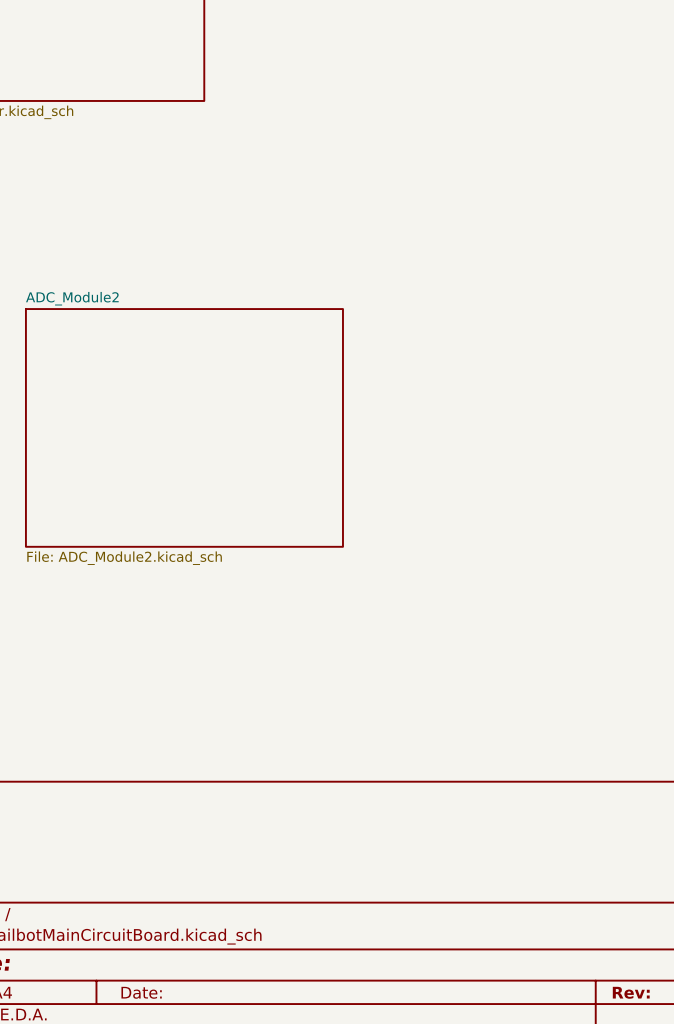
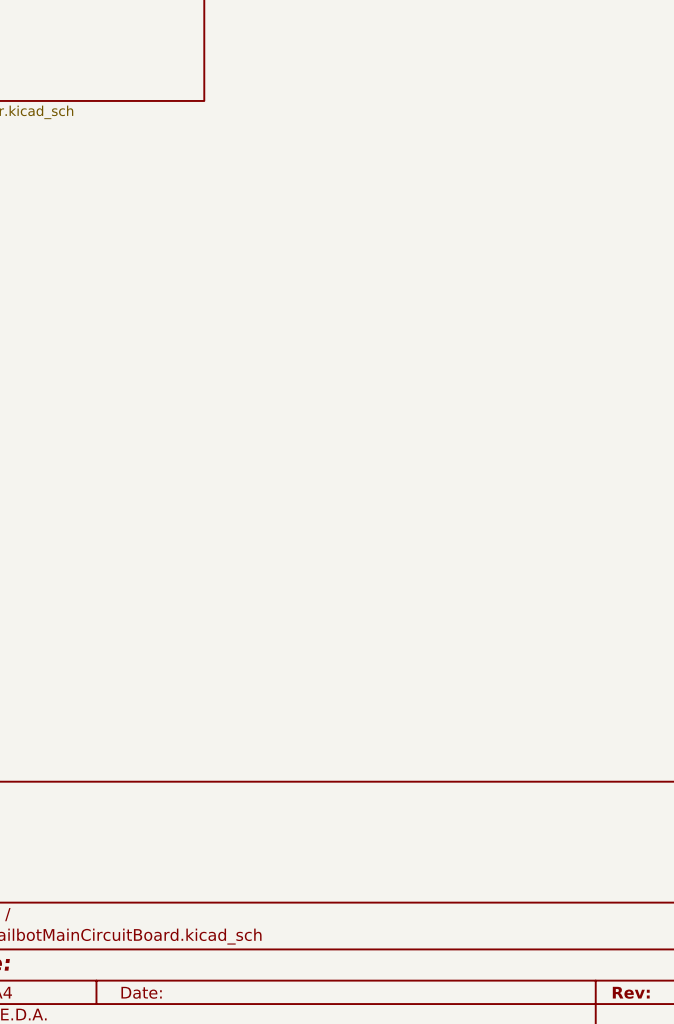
sheet ADC_Module2: File: ADC_Module2.kicad_sch (184, 427) -> none

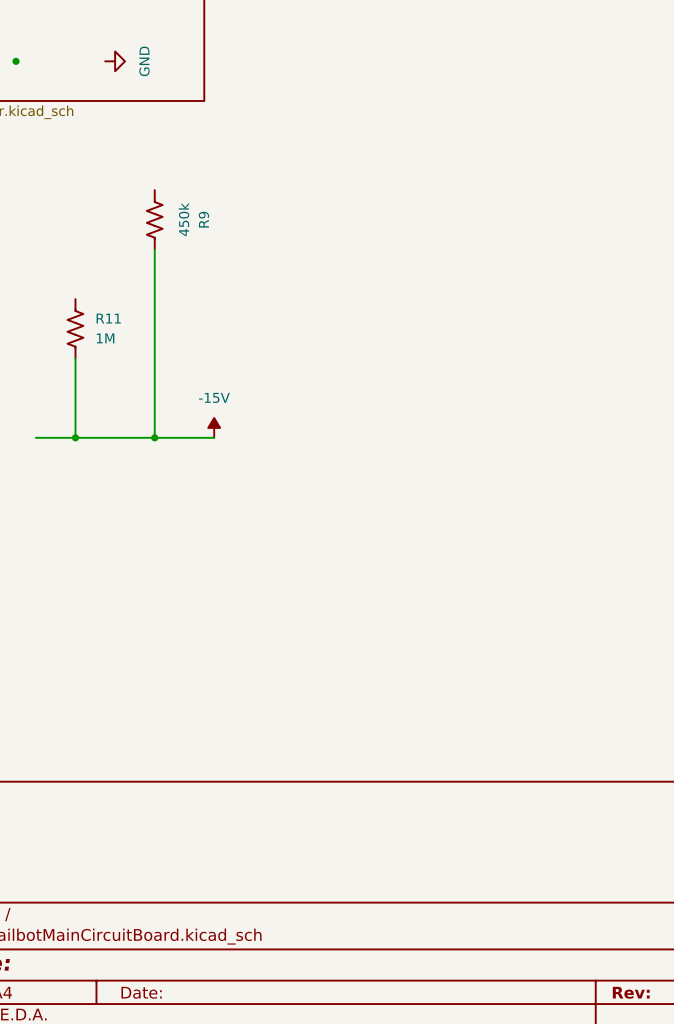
junction: none -> (16, 61)
power symbol: none -> GND (115, 61)
R9: none -> 450k (154, 219)
wire: none -> (154, 249) (154, 437)
R11: none -> 1M (75, 328)
wire: none -> (75, 358) (75, 437)
power symbol: none -> -15V (214, 427)
wire: none -> (35, 437) (214, 437)
junction: none -> (75, 437)
junction: none -> (154, 437)

